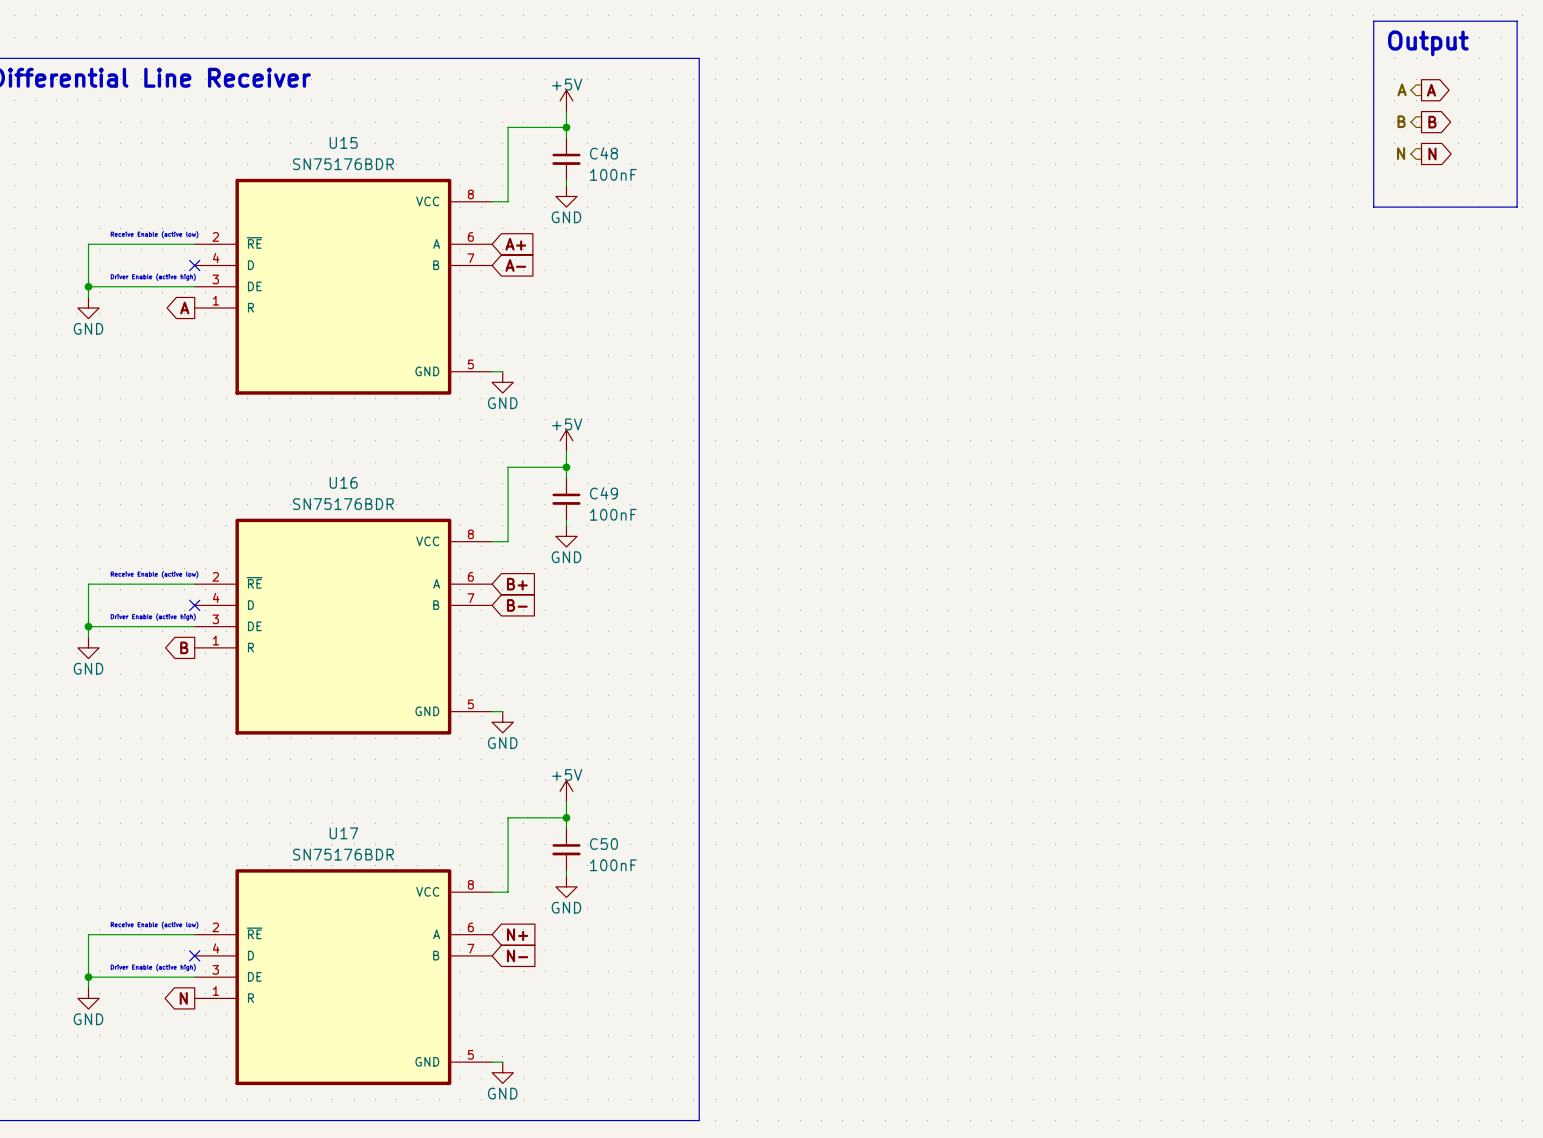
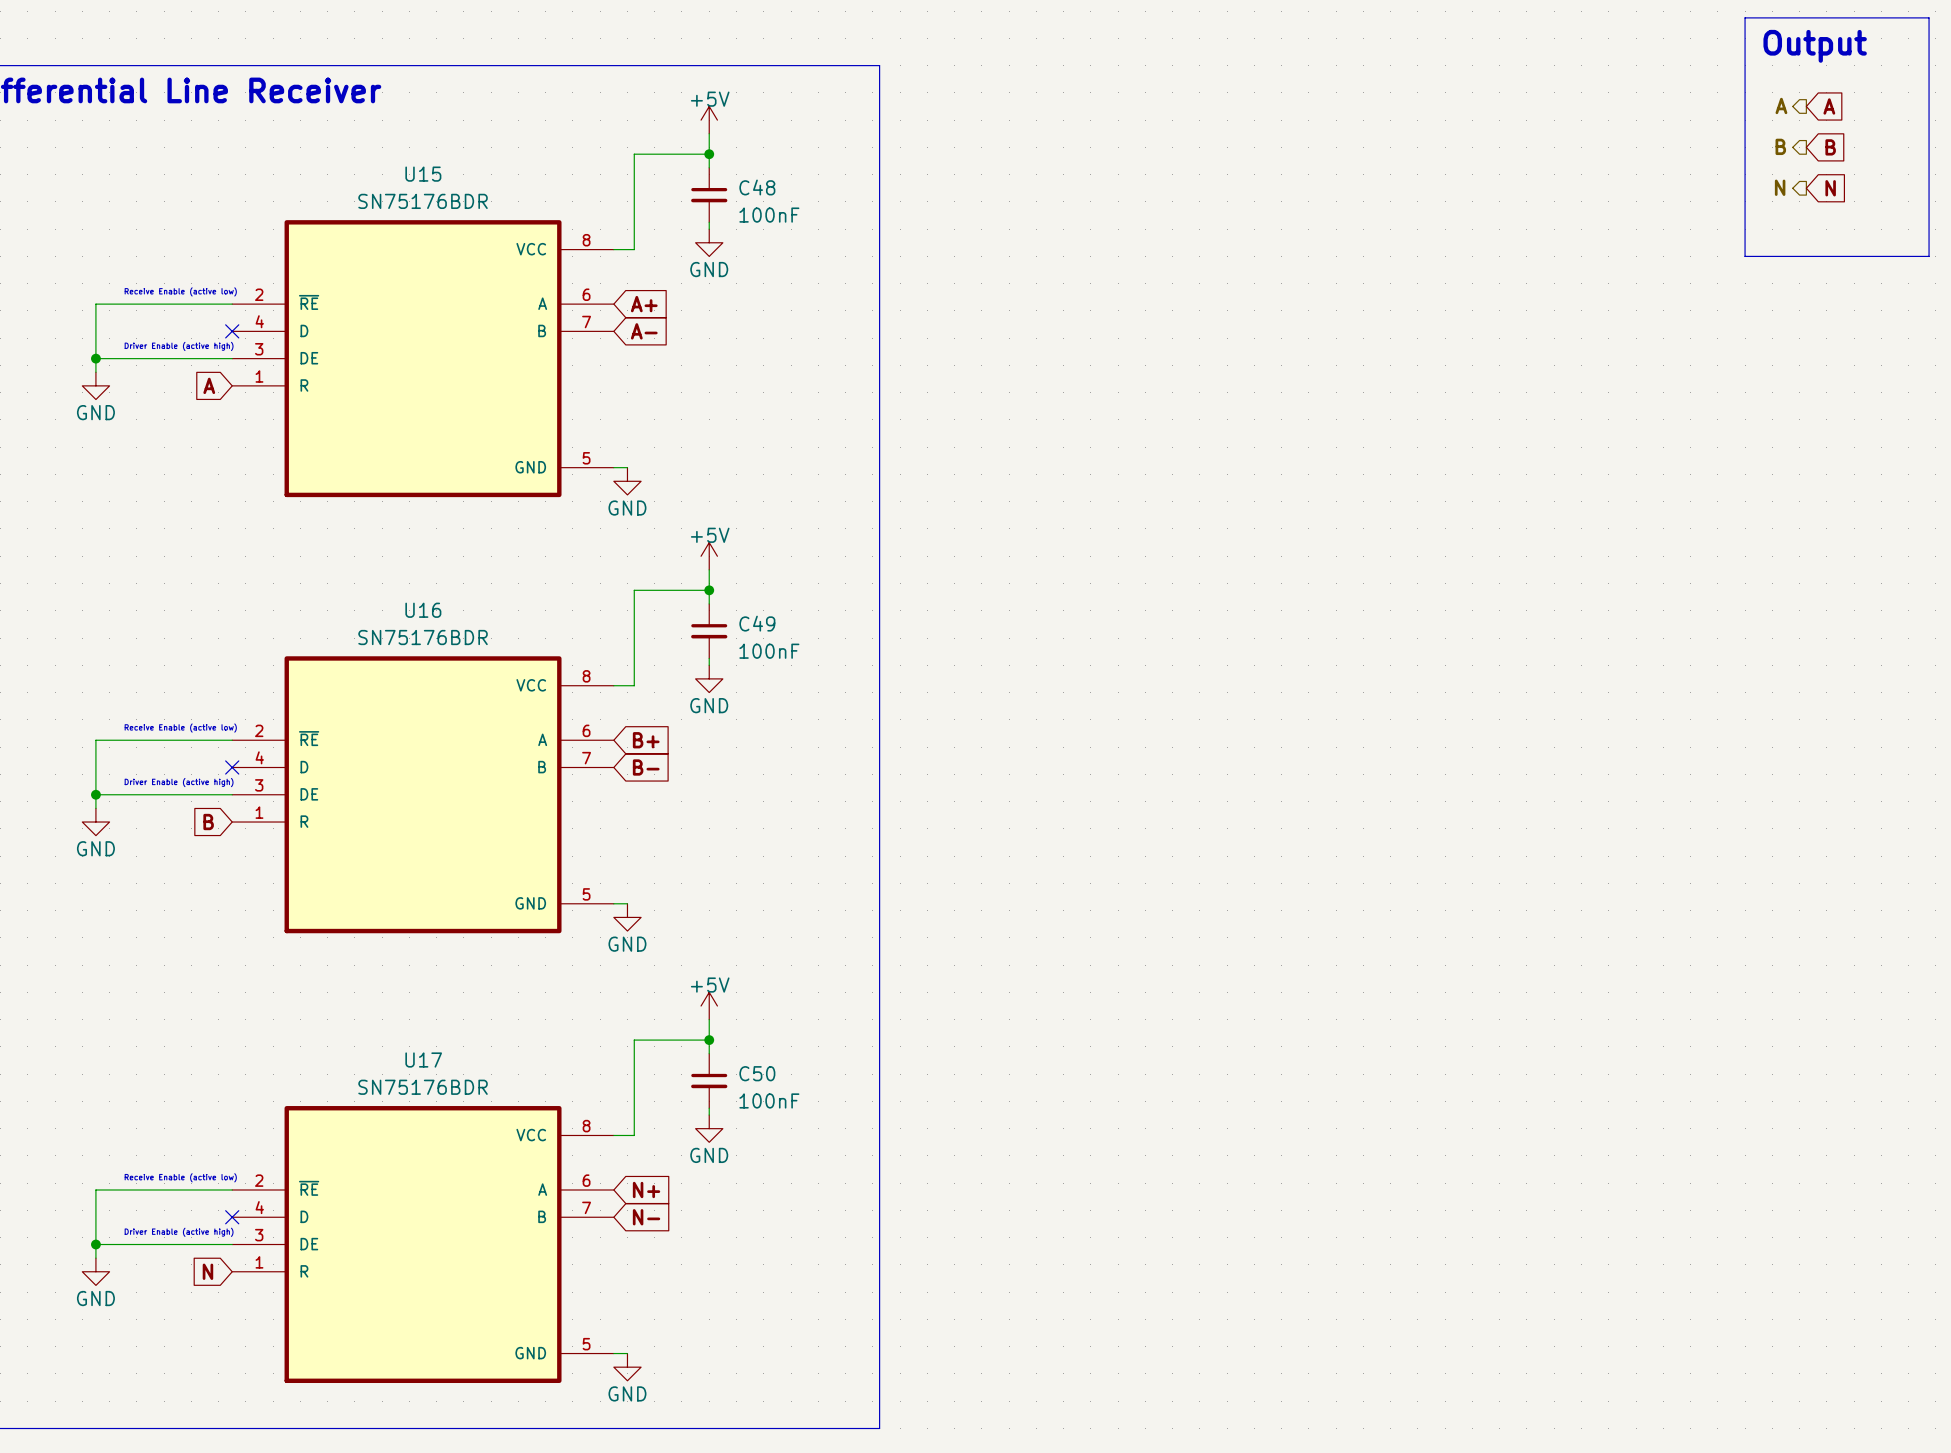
global label shape: output (1431, 90) -> input (1829, 106)
global label shape: output (1432, 122) -> input (1830, 147)
global label shape: output (1432, 153) -> input (1830, 188)
global label shape: output (184, 307) -> input (209, 385)
global label shape: output (184, 647) -> input (208, 822)
global label shape: output (183, 998) -> input (207, 1271)

